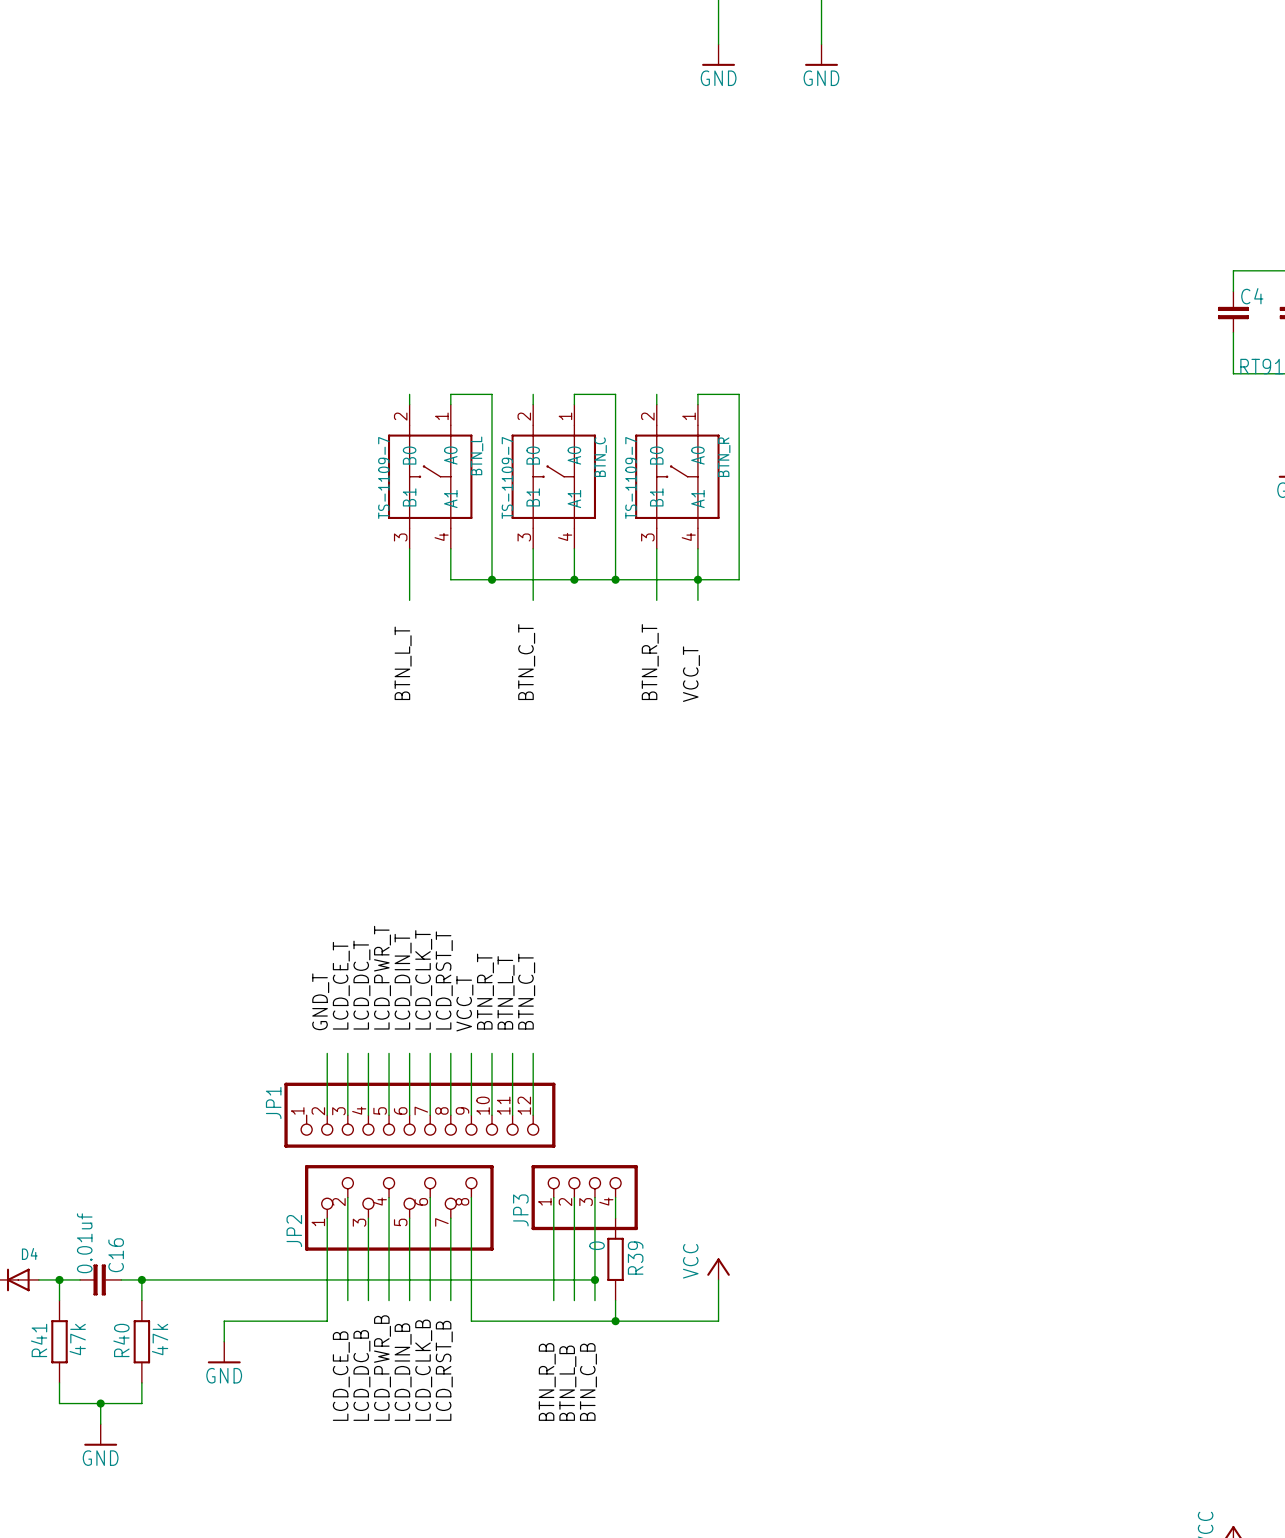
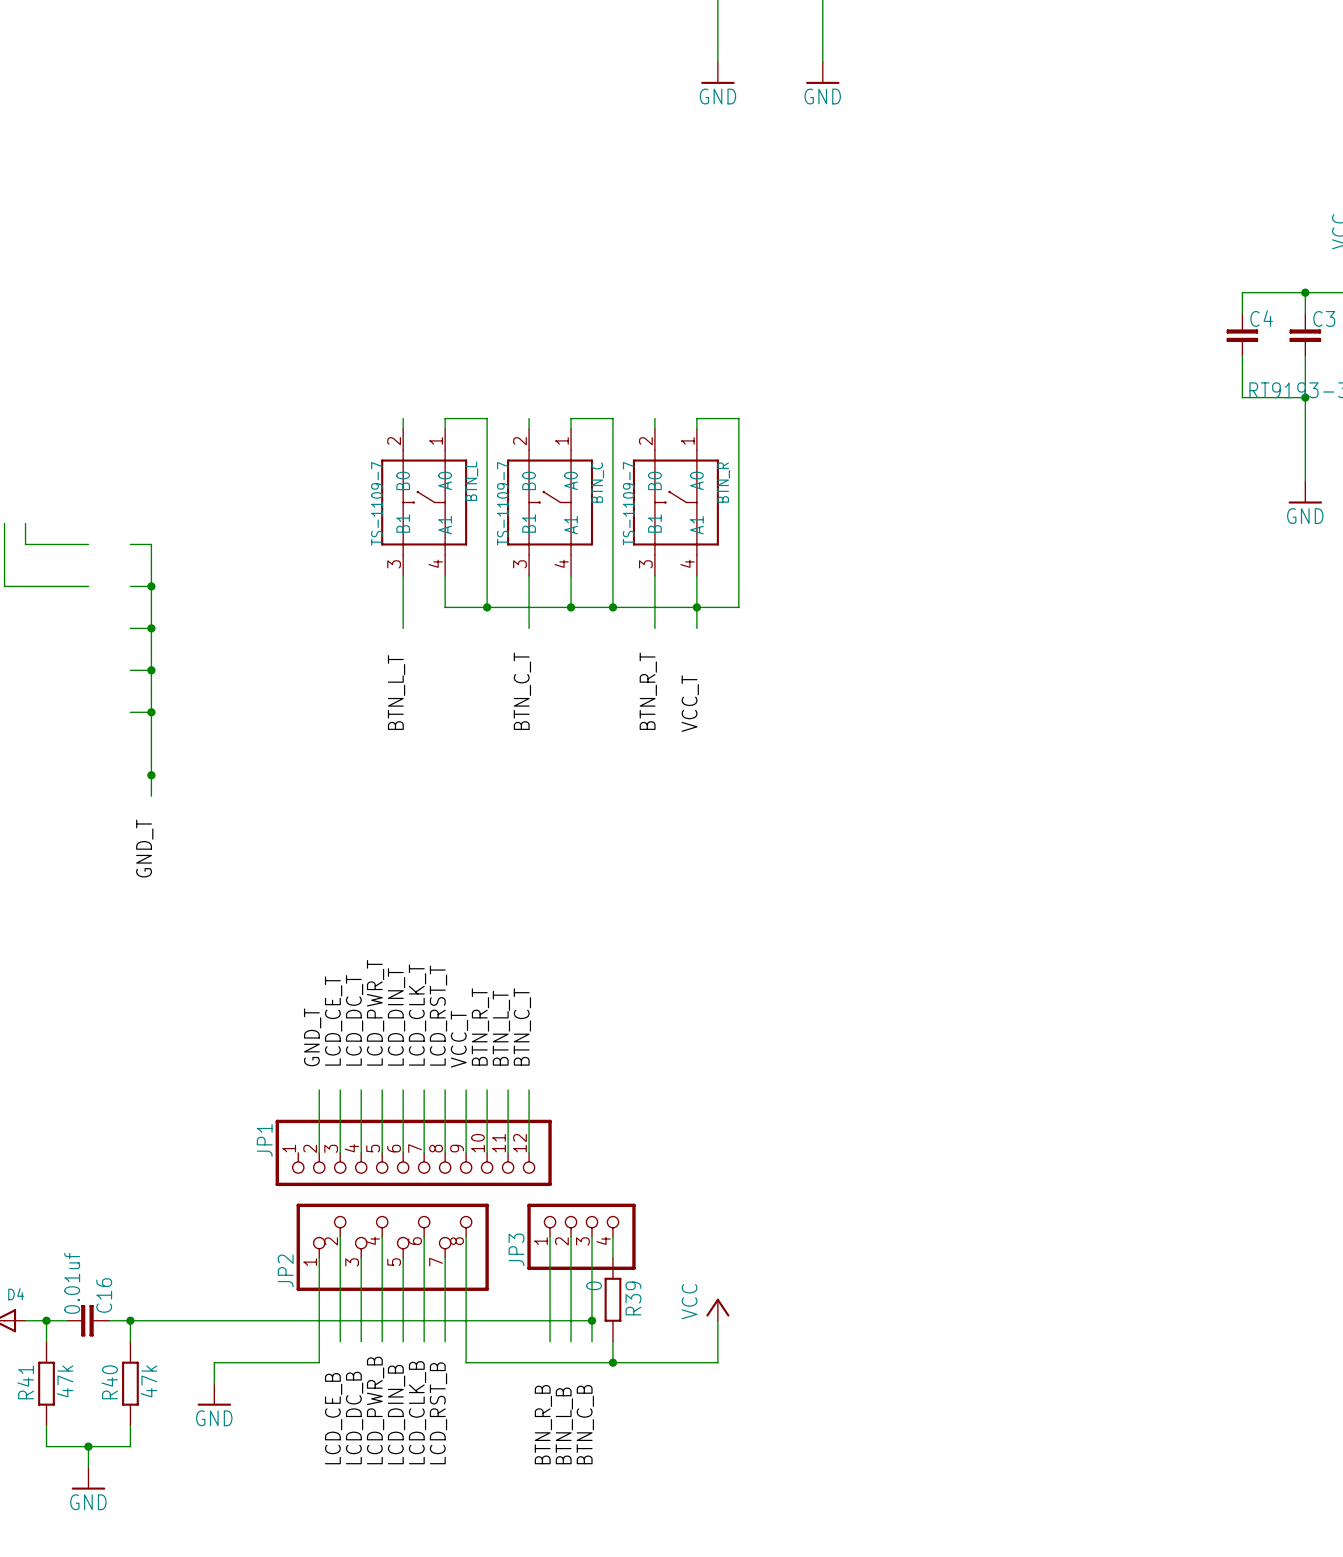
wire: none -> (4, 523) (4, 586) (88, 586)
wire: none -> (25, 523) (25, 544) (88, 544)
wire: none -> (130, 544) (151, 544) (151, 796)
wire: none -> (130, 586) (151, 586)
junction: none -> (151, 586)
wire: none -> (130, 628) (151, 628)
junction: none -> (151, 628)
wire: none -> (130, 670) (151, 670)
junction: none -> (151, 670)
wire: none -> (130, 712) (151, 712)
junction: none -> (151, 712)
junction: none -> (151, 775)
label: none -> GND_T (144, 848)

